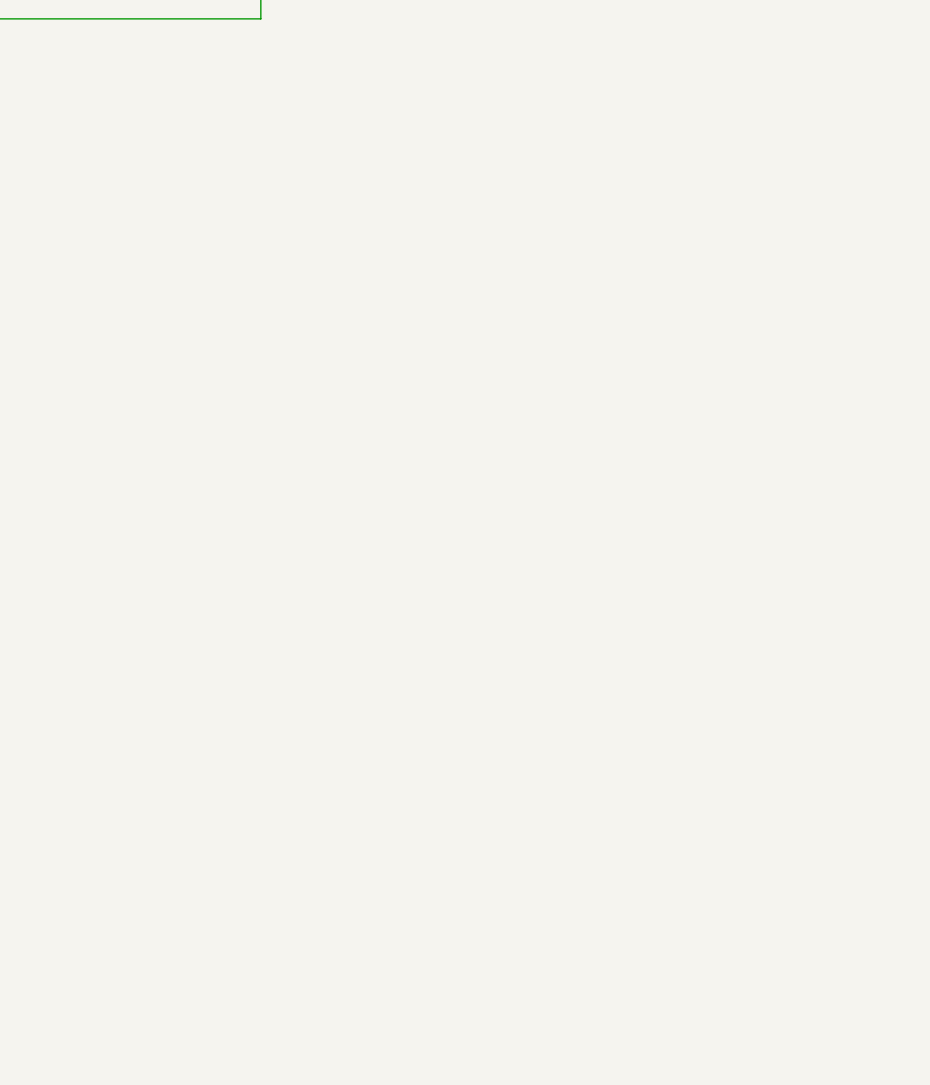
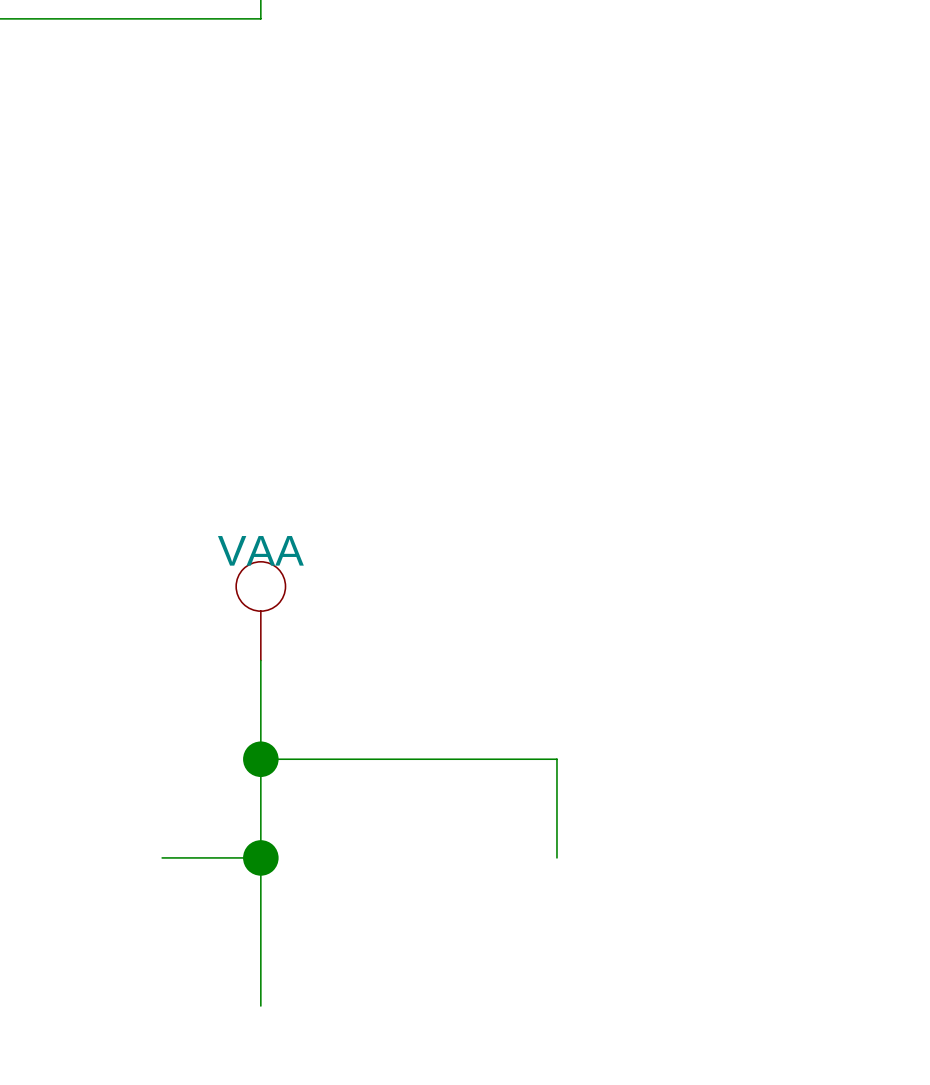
power symbol: none -> VAA (260, 611)
wire: none -> (260, 660) (260, 1006)
wire: none -> (260, 759) (556, 759) (556, 857)
junction: none -> (260, 759)
wire: none -> (162, 857) (260, 857)
junction: none -> (260, 857)

